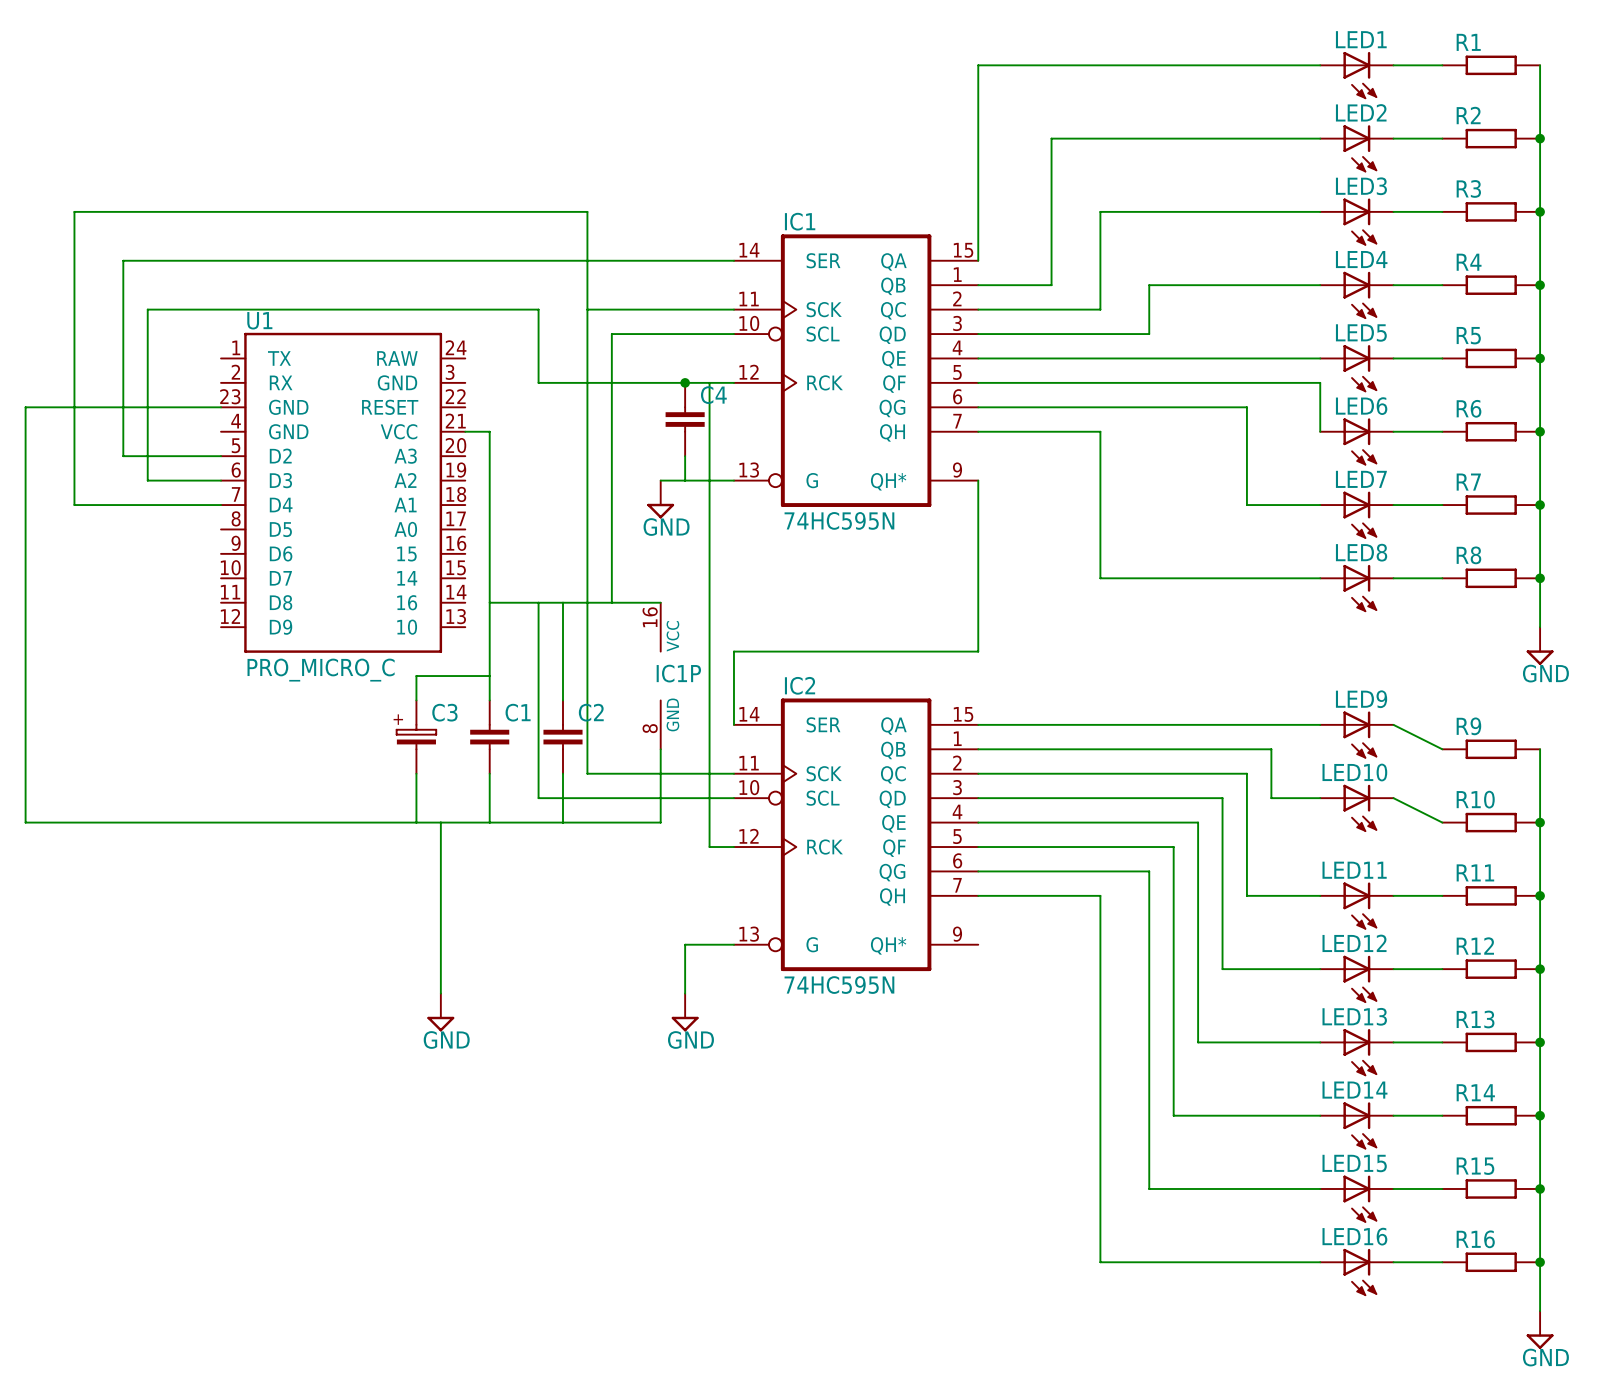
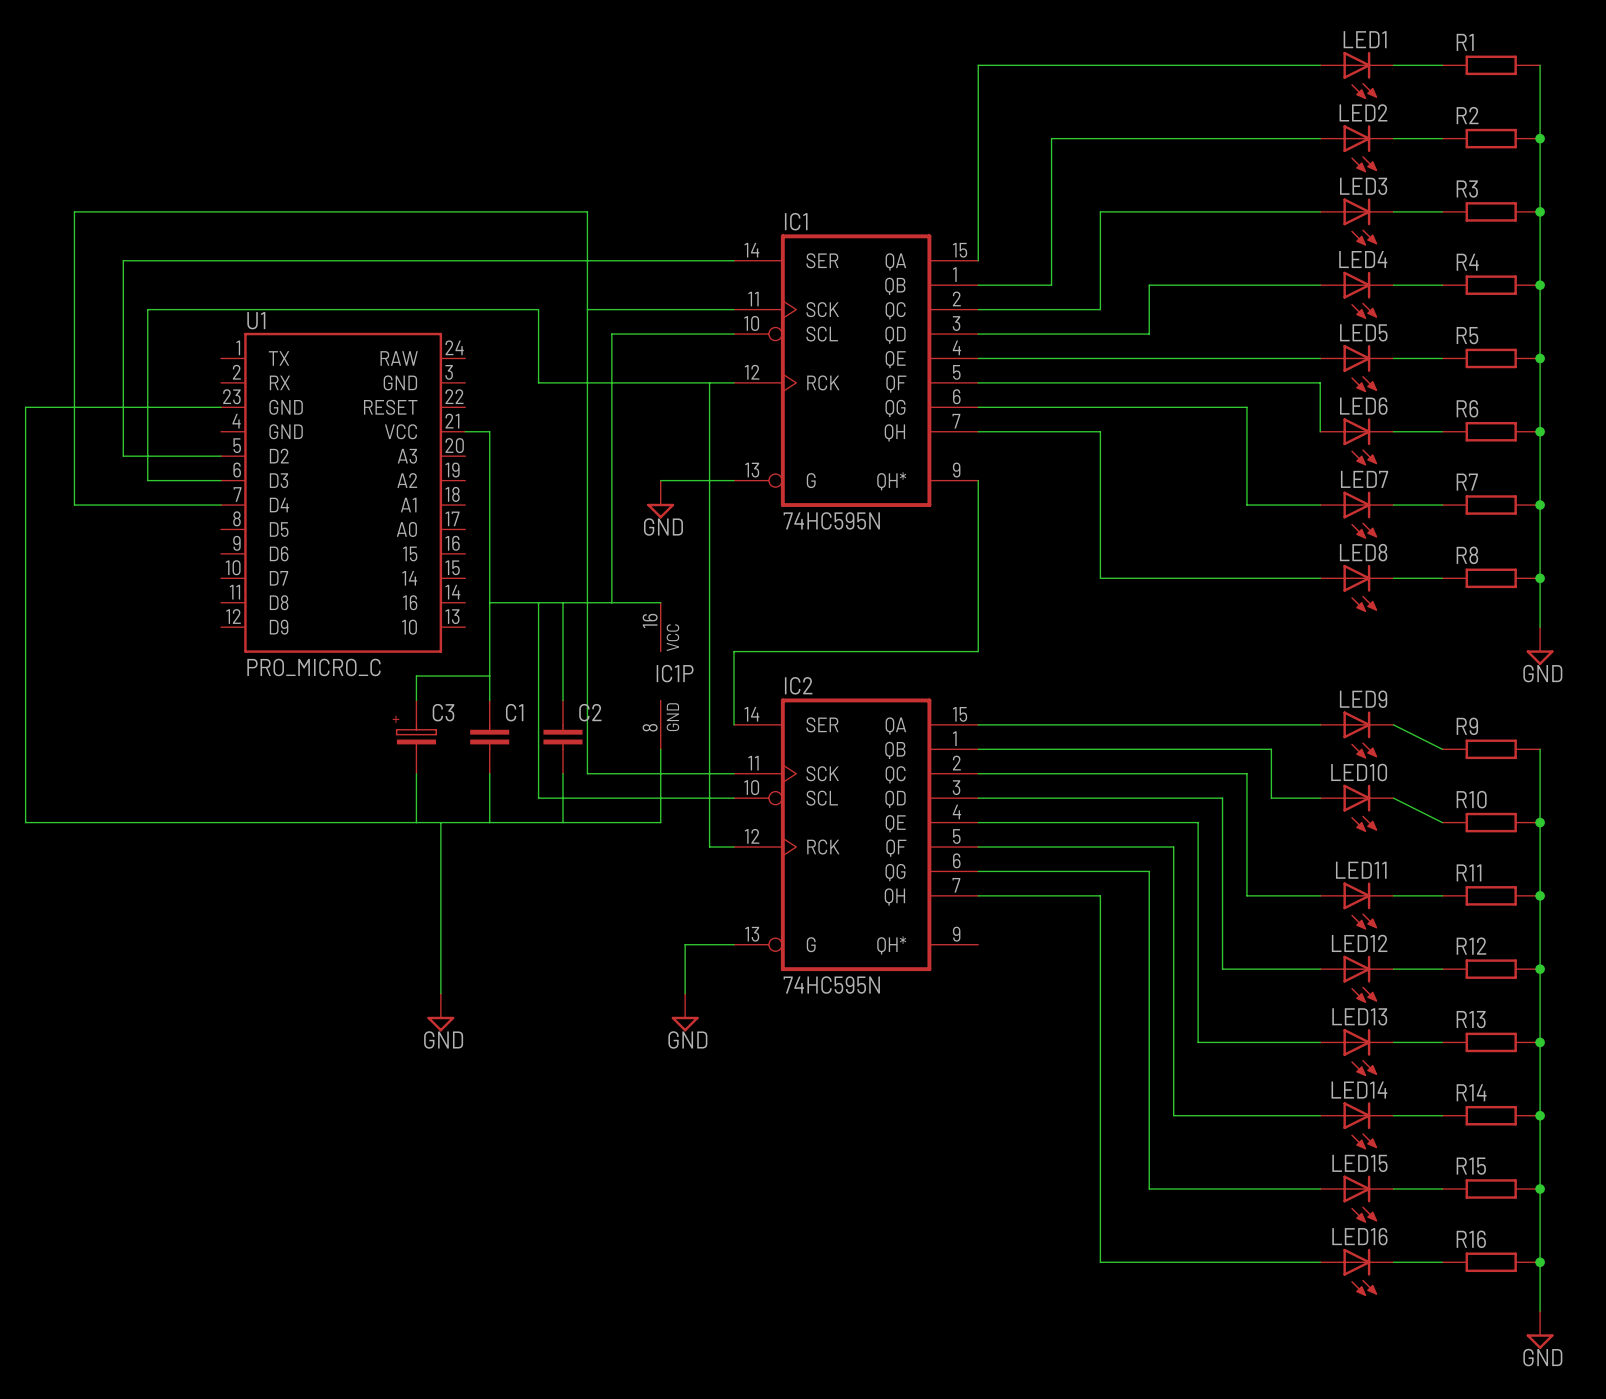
junction: (685, 382) -> none
C4: (685, 419) -> none
wire: (685, 456) (685, 480) -> none

